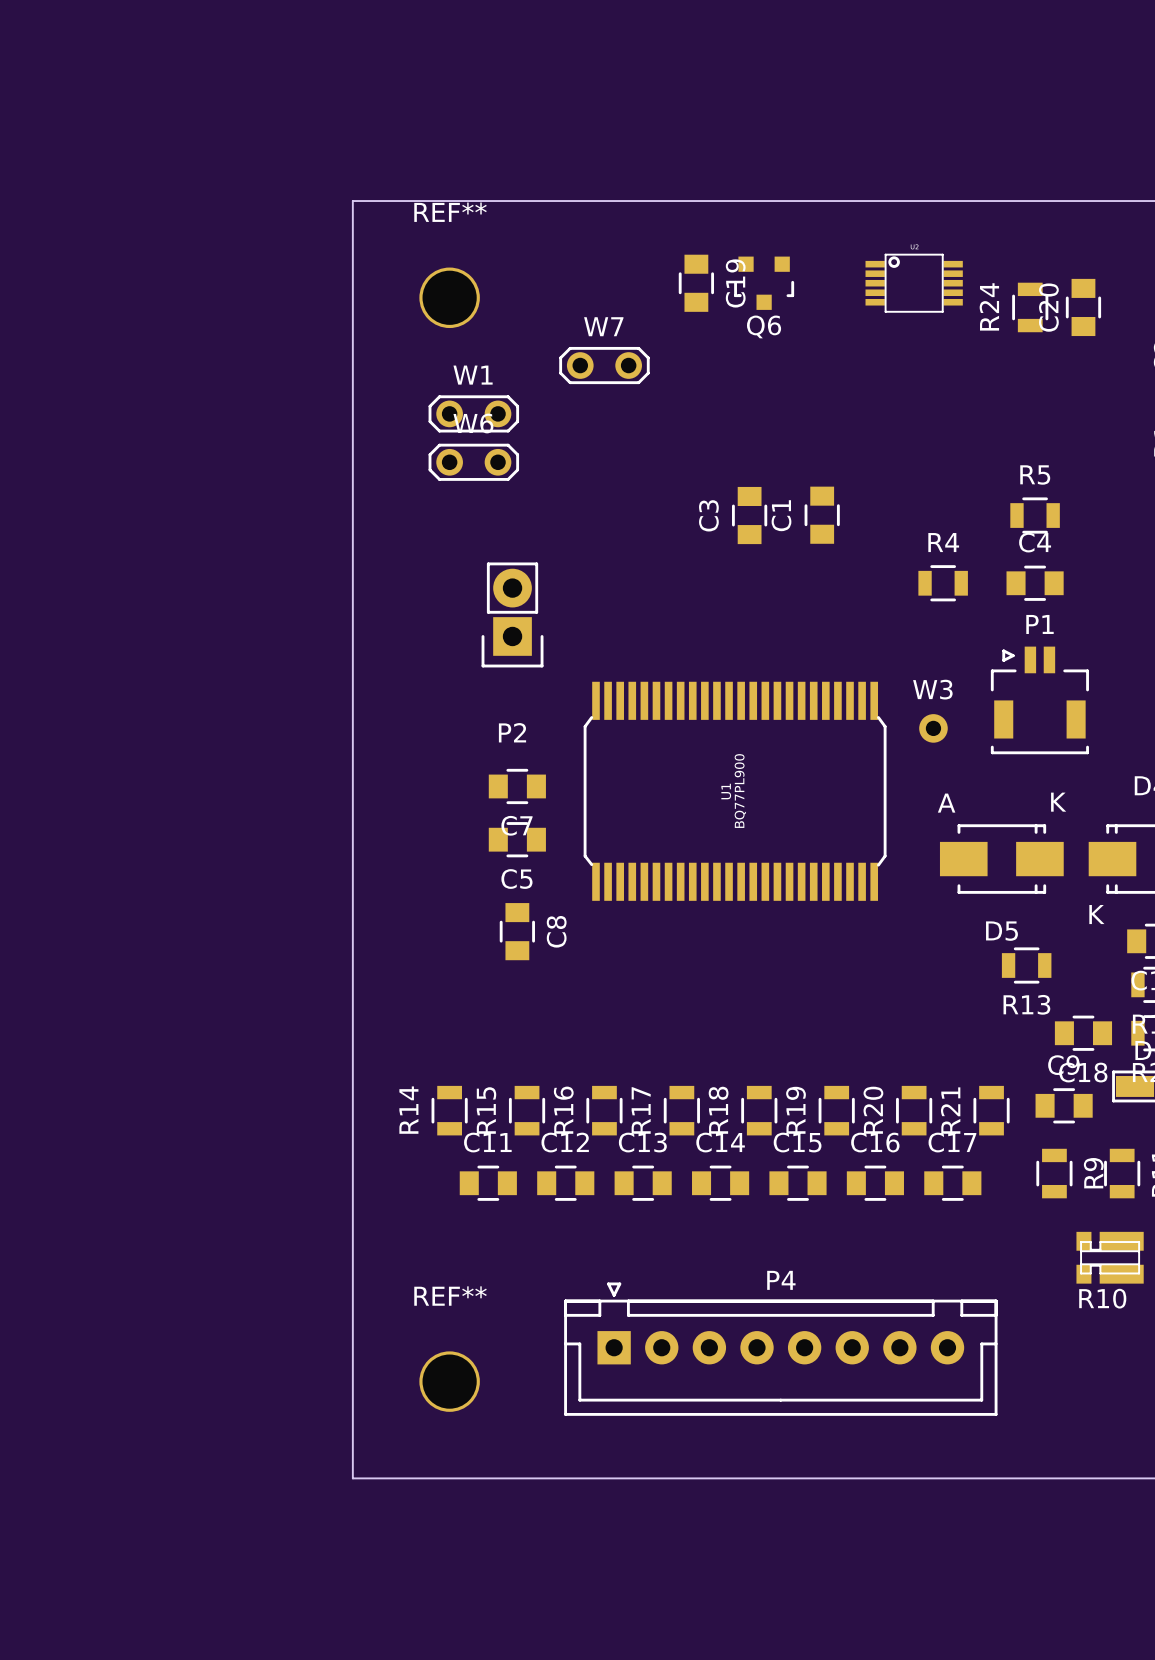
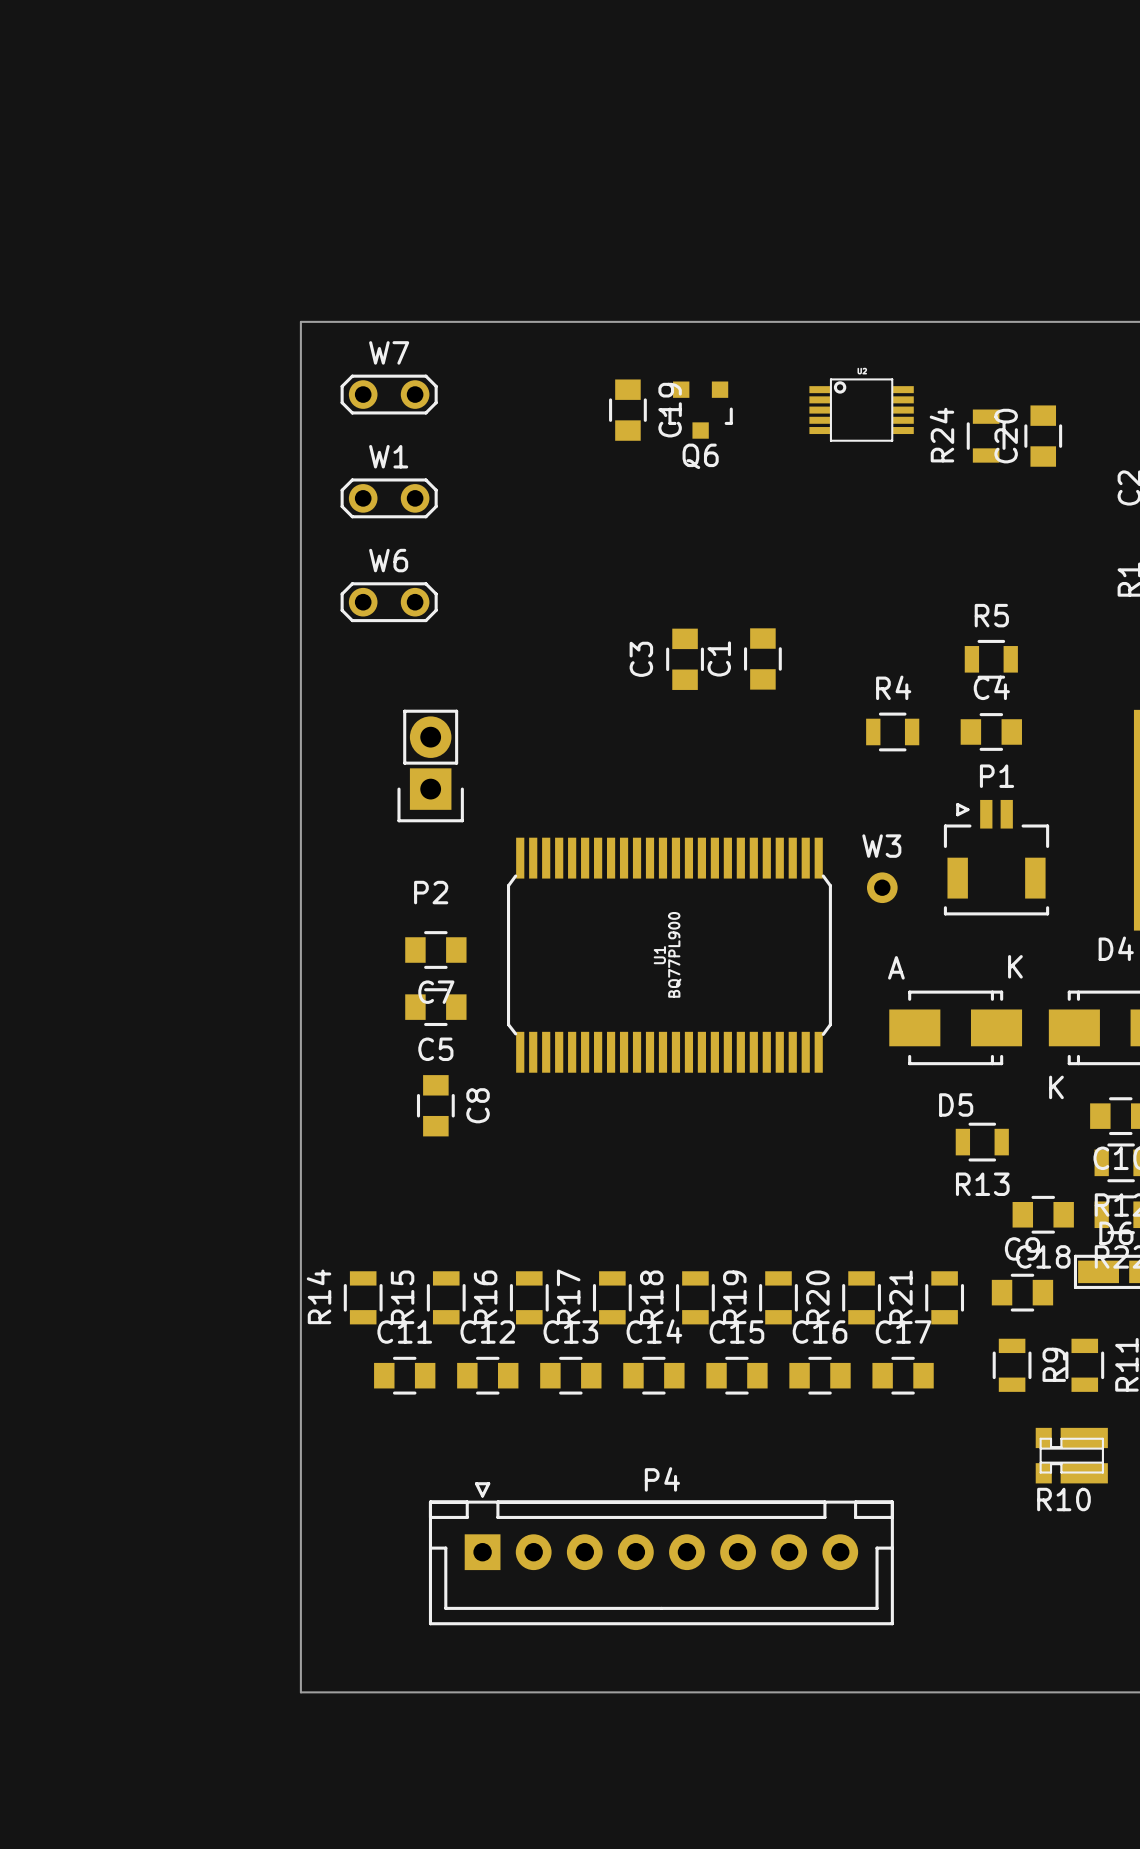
board edge: (391, 201) (352, 201) (352, 1478) (391, 1478) -> (300, 321) (300, 1692)
REF**: (449, 297) -> none
W7 position: (604, 365) -> (389, 394)
W1 position: (473, 413) -> (389, 498)
P4 position: (780, 1349) -> (661, 1553)
REF**: (449, 1381) -> none

